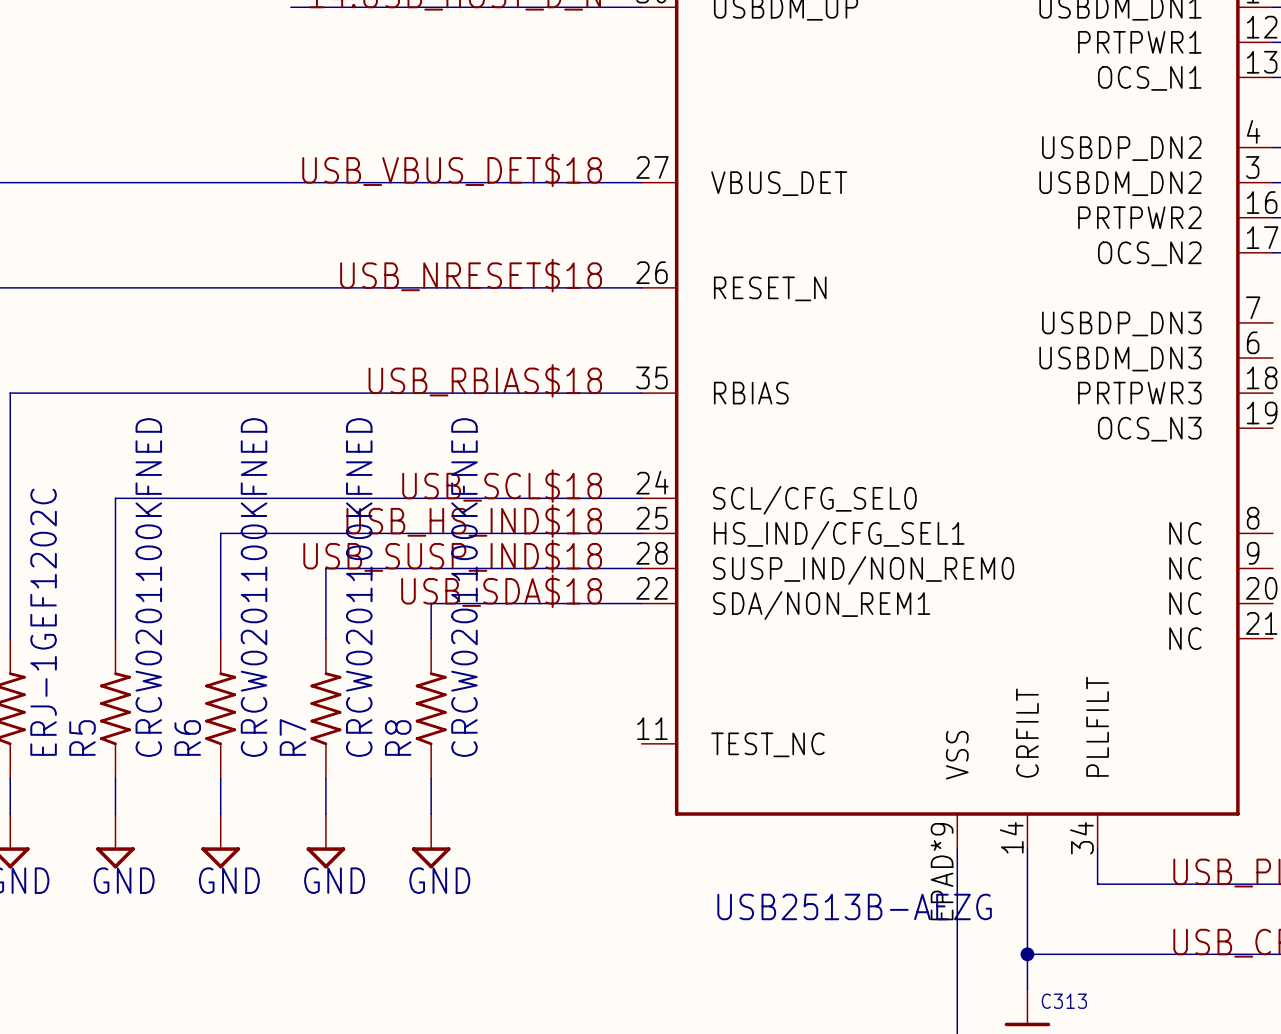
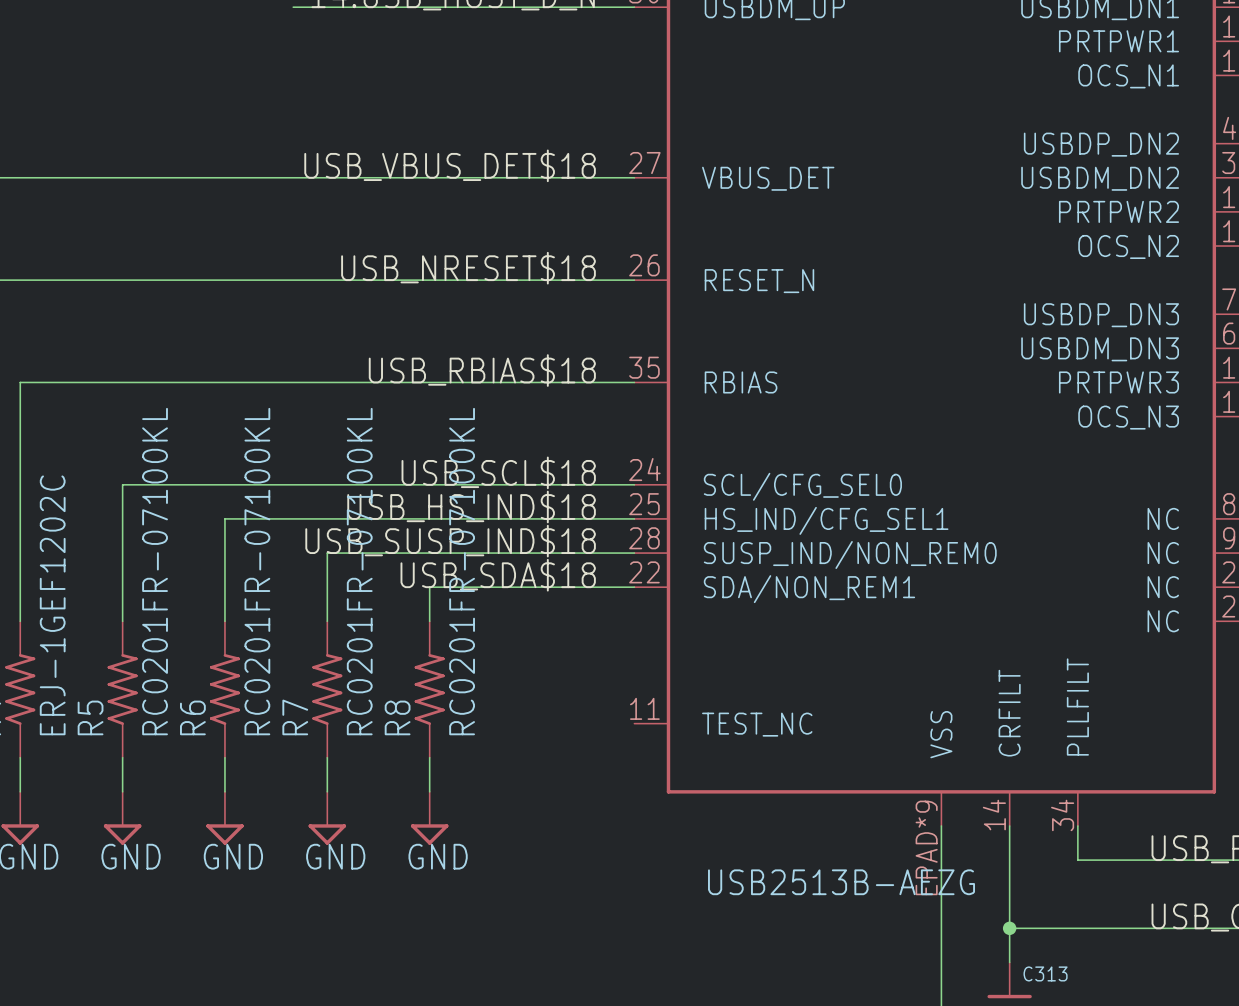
R5 value: CRCW0201100KFNED (148, 587) -> RC0201FR-07100KL (155, 571)
R6 value: CRCW0201100KFNED (254, 587) -> RC0201FR-07100KL (257, 571)
R7 value: CRCW0201100KFNED (359, 587) -> RC0201FR-07100KL (359, 571)
R8 value: CRCW0201100KFNED (464, 587) -> RC0201FR-07100KL (462, 571)

